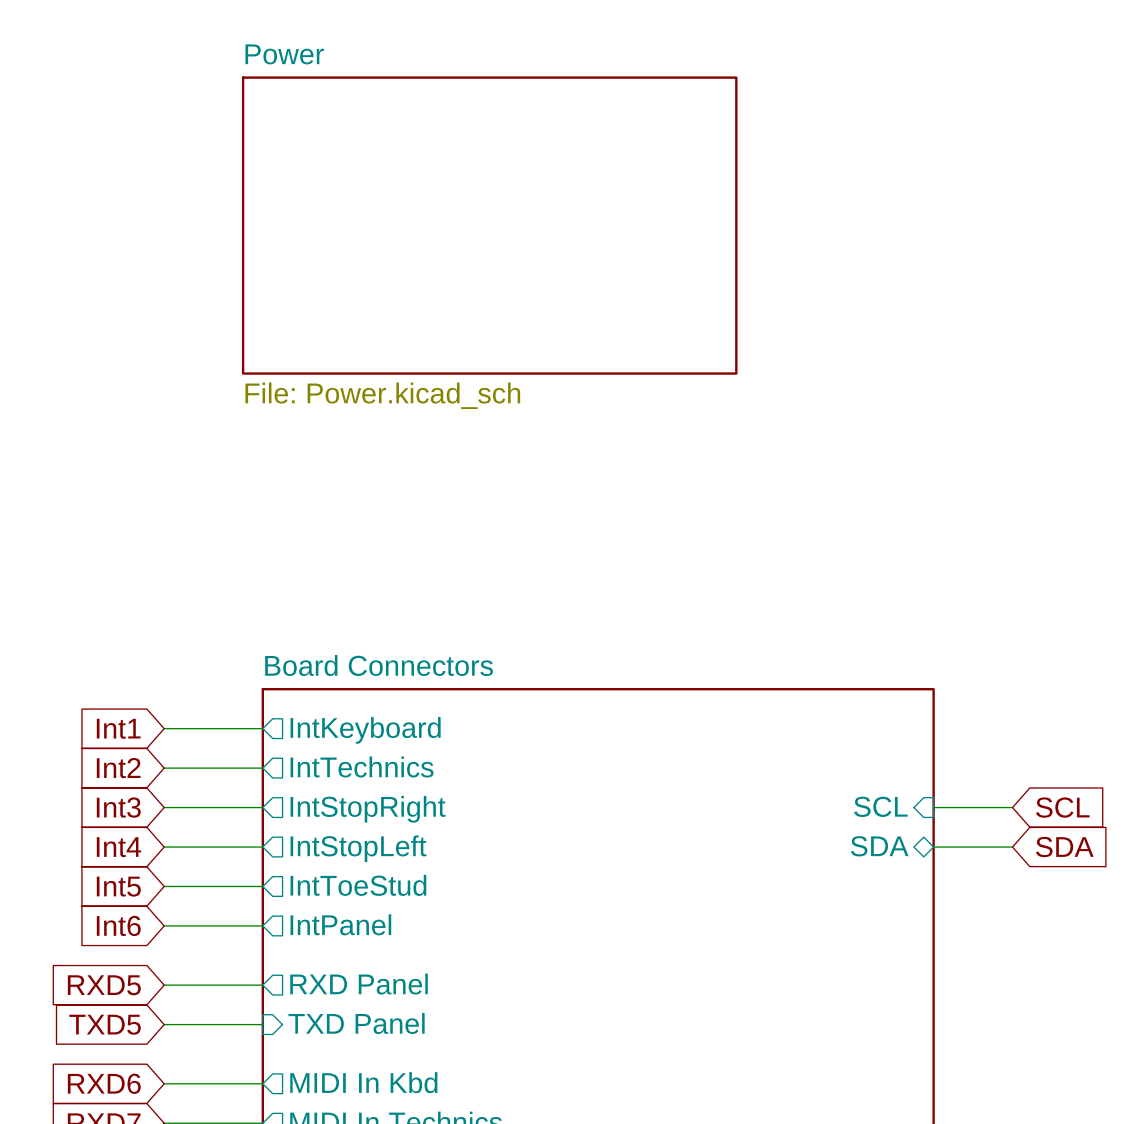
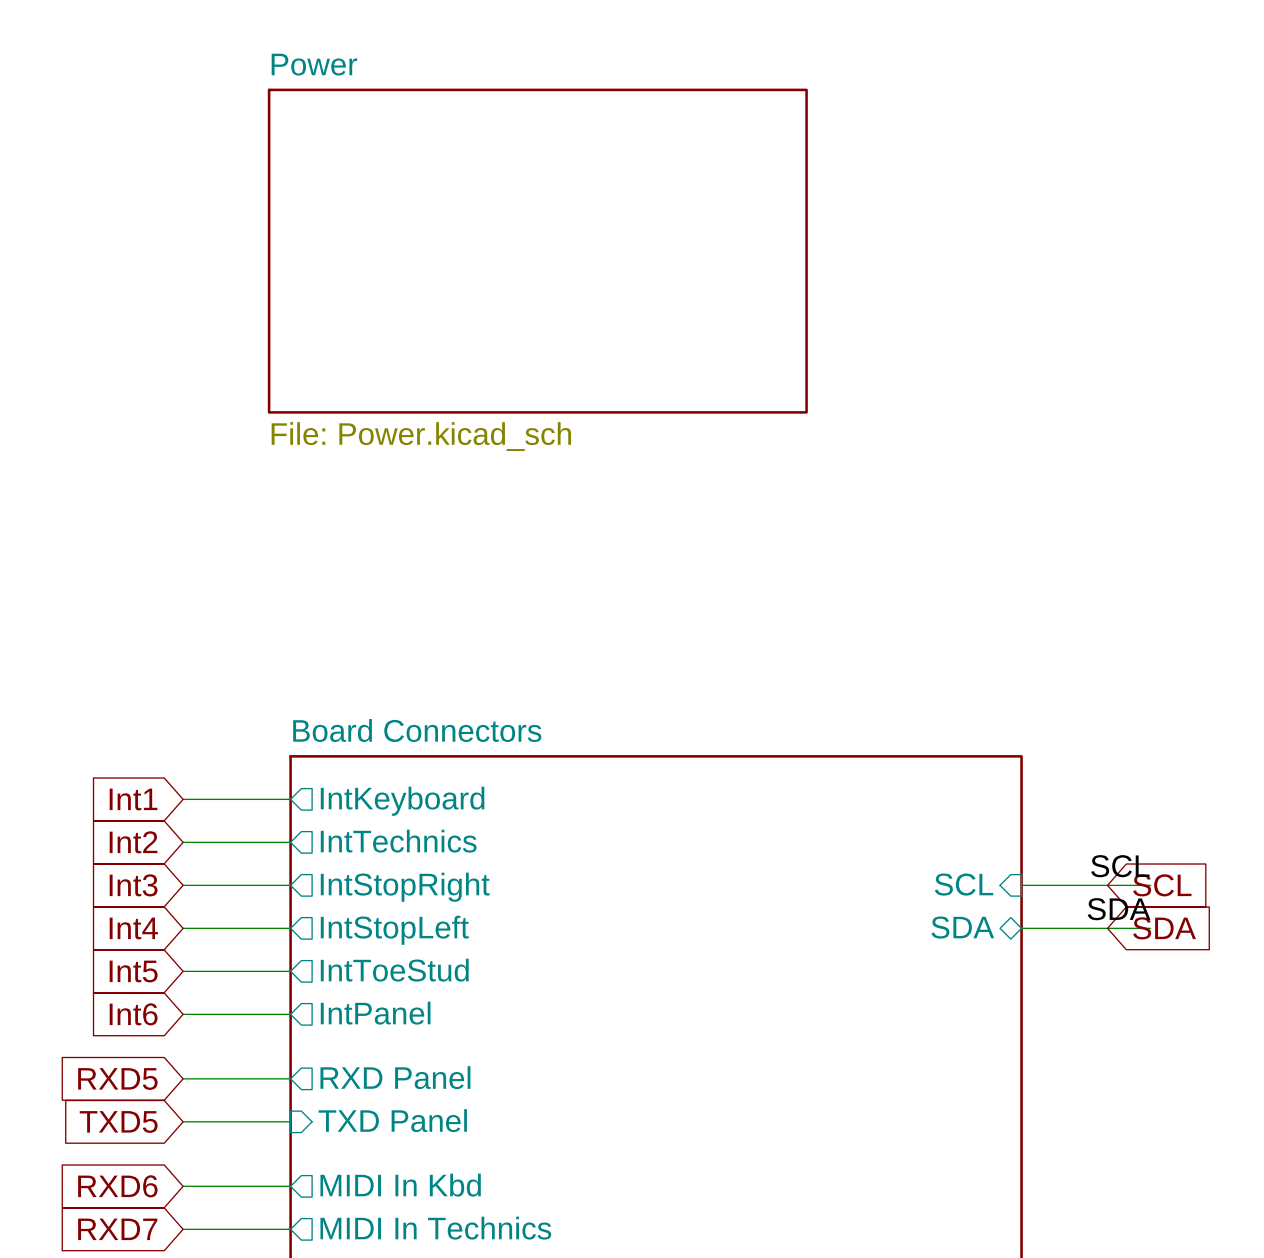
label: none -> SCL (1120, 866)
wire: none -> (1107, 885) (1150, 885)
label: none -> SDA (1119, 909)
wire: none -> (1107, 928) (1150, 928)

